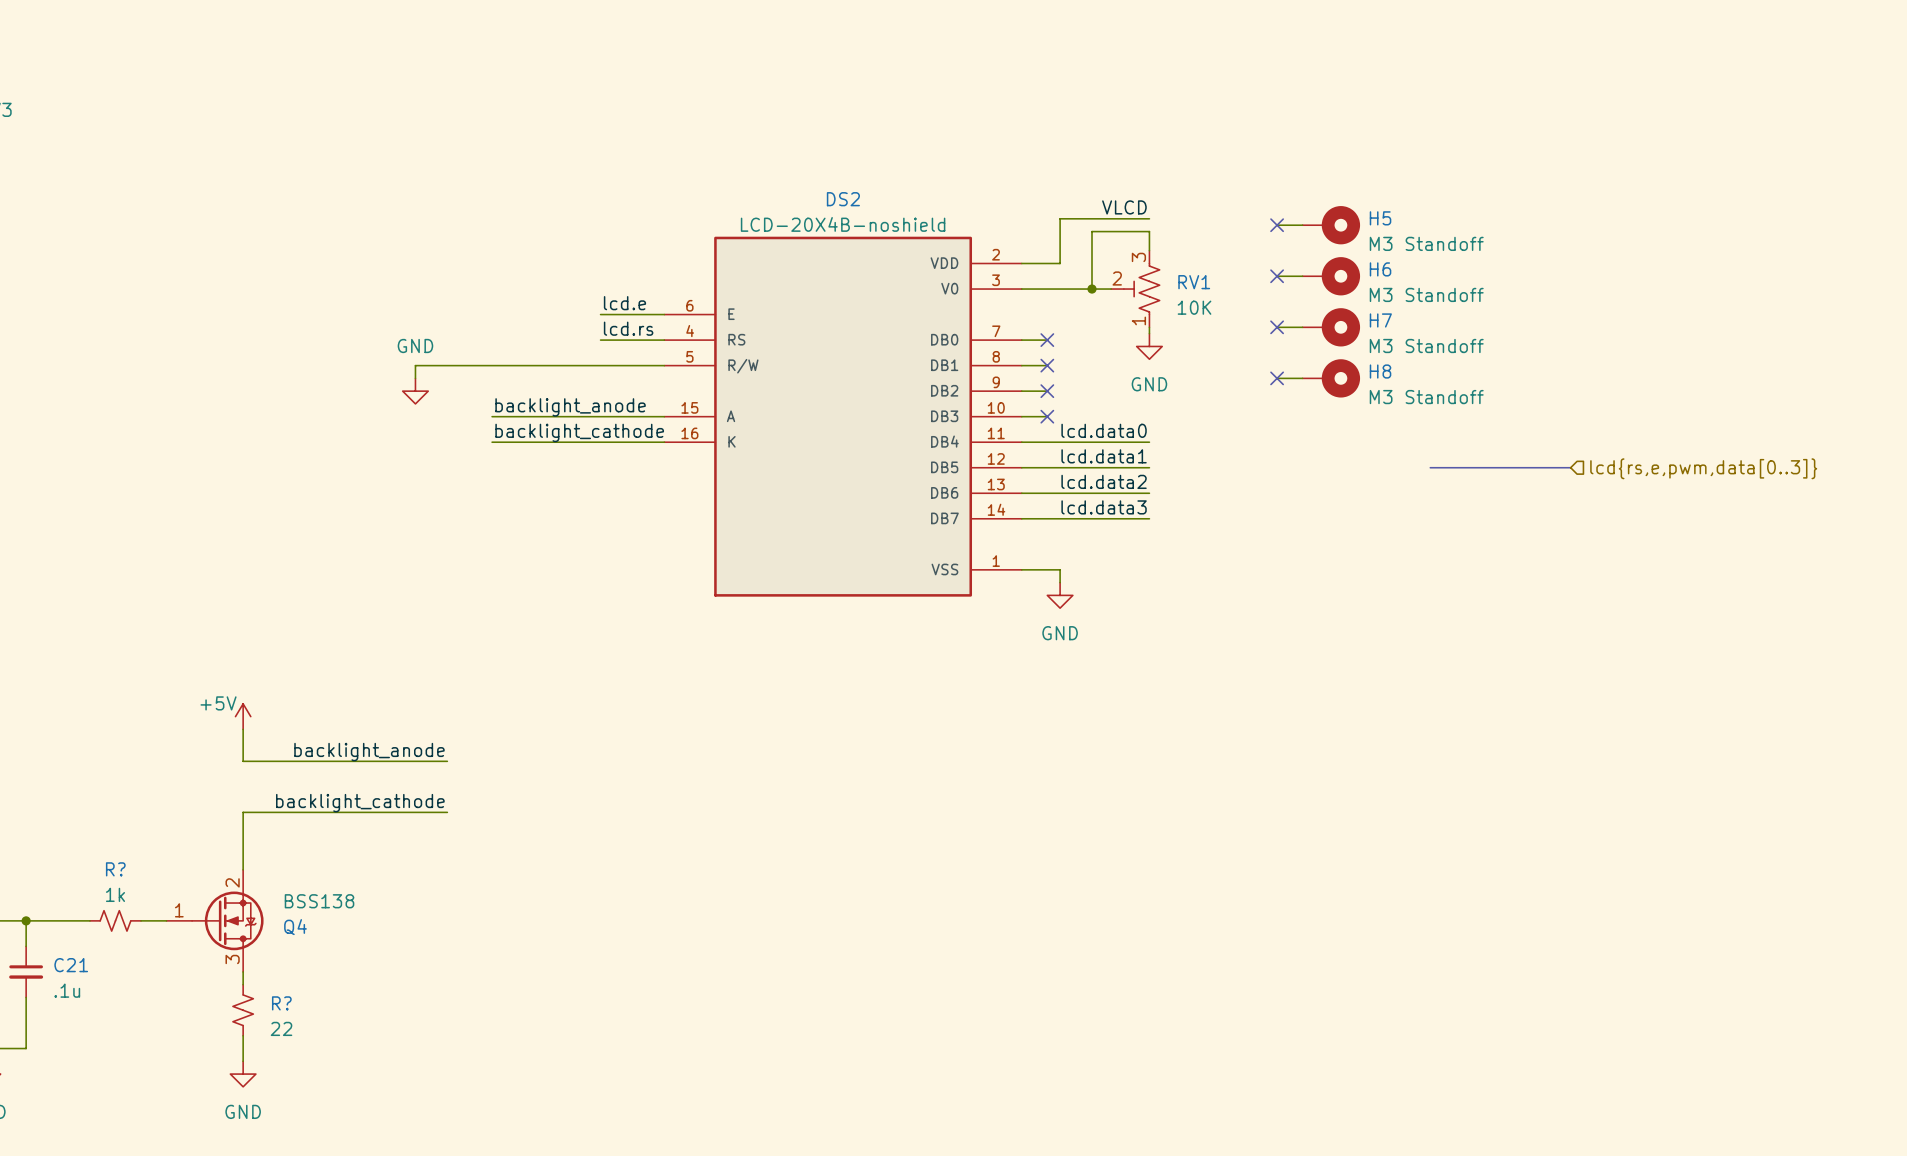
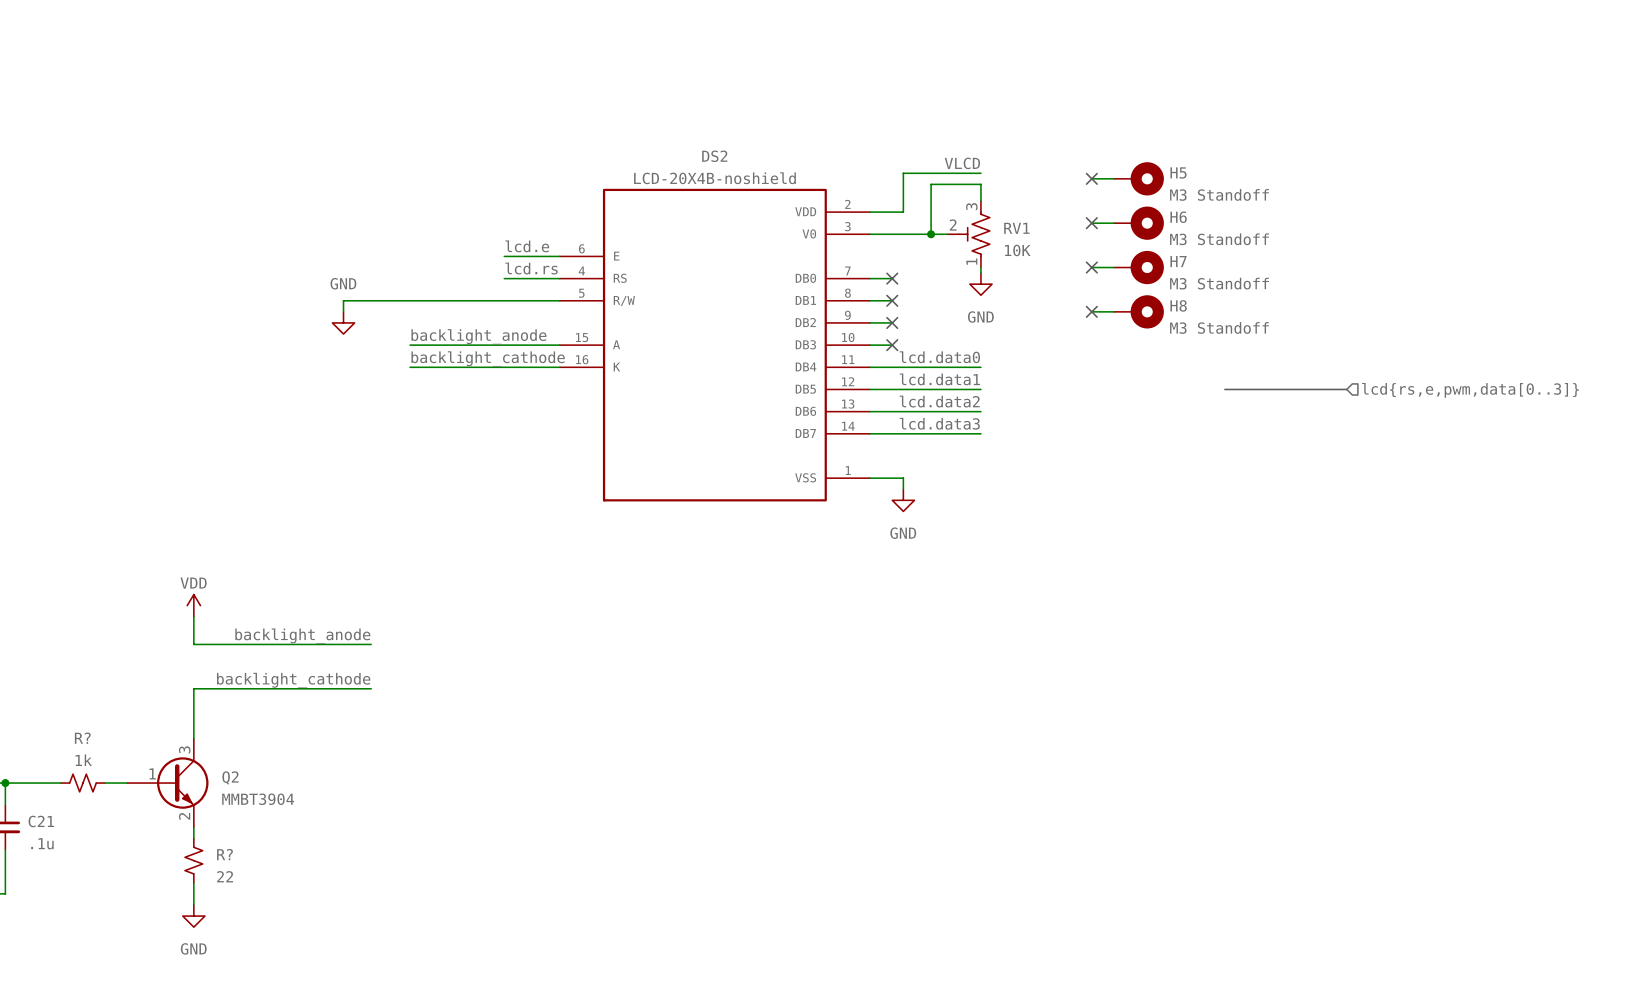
power symbol: +5V (243, 716) -> VDD (193, 605)
Q2: none -> MMBT3904 (167, 783)
Q4: BSS138 (215, 920) -> none

